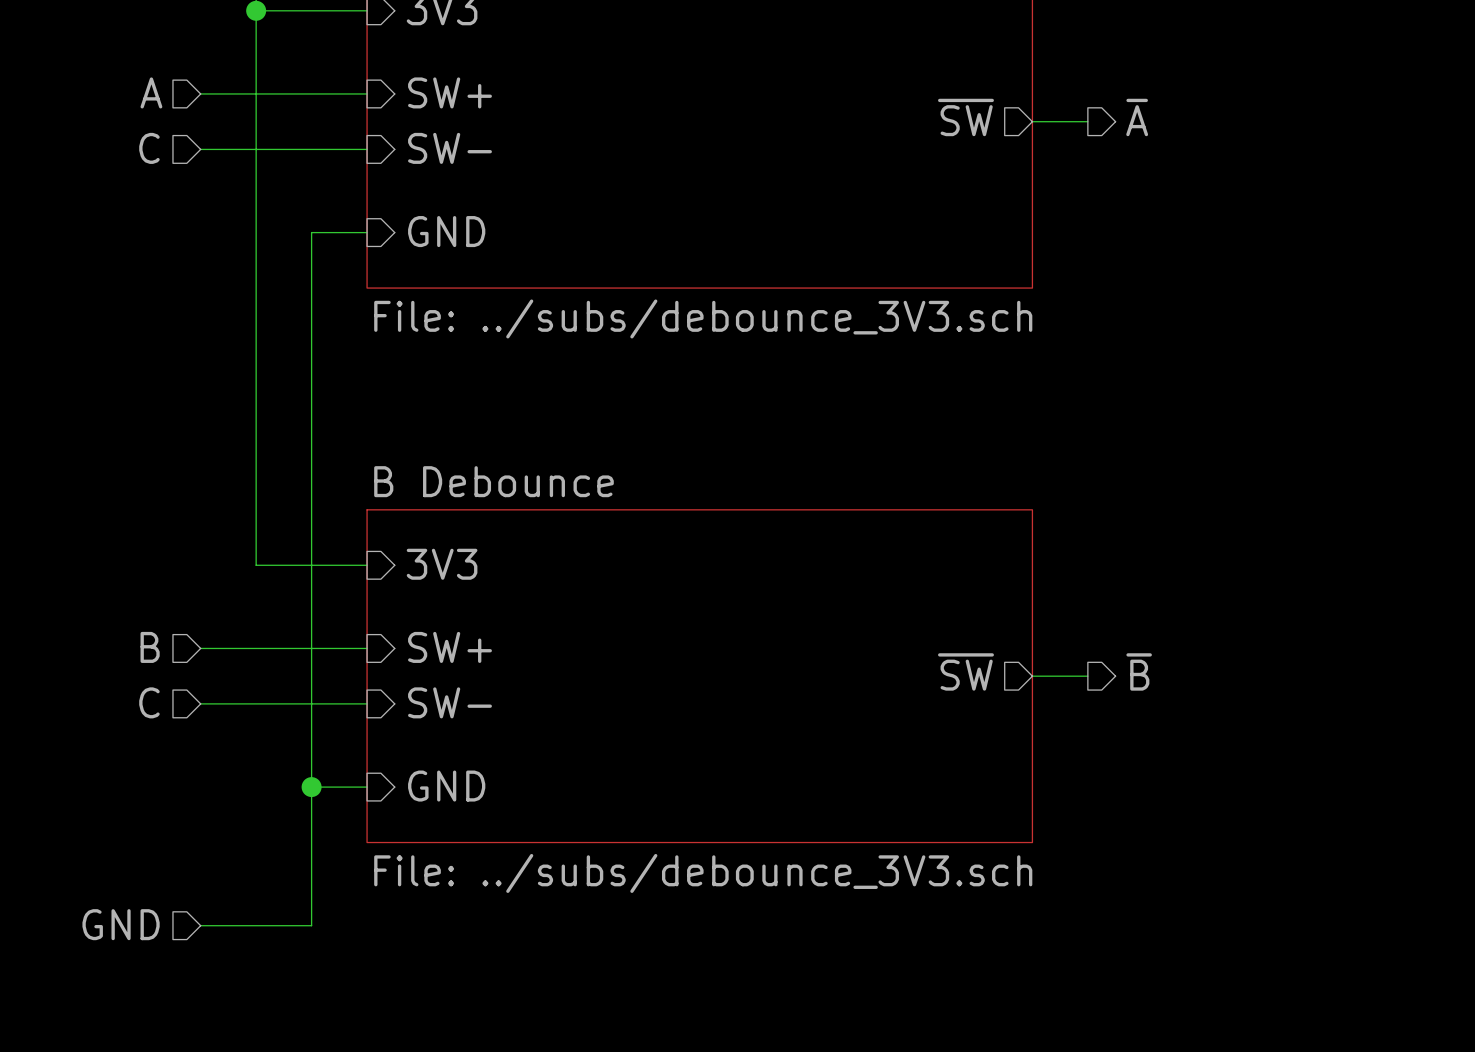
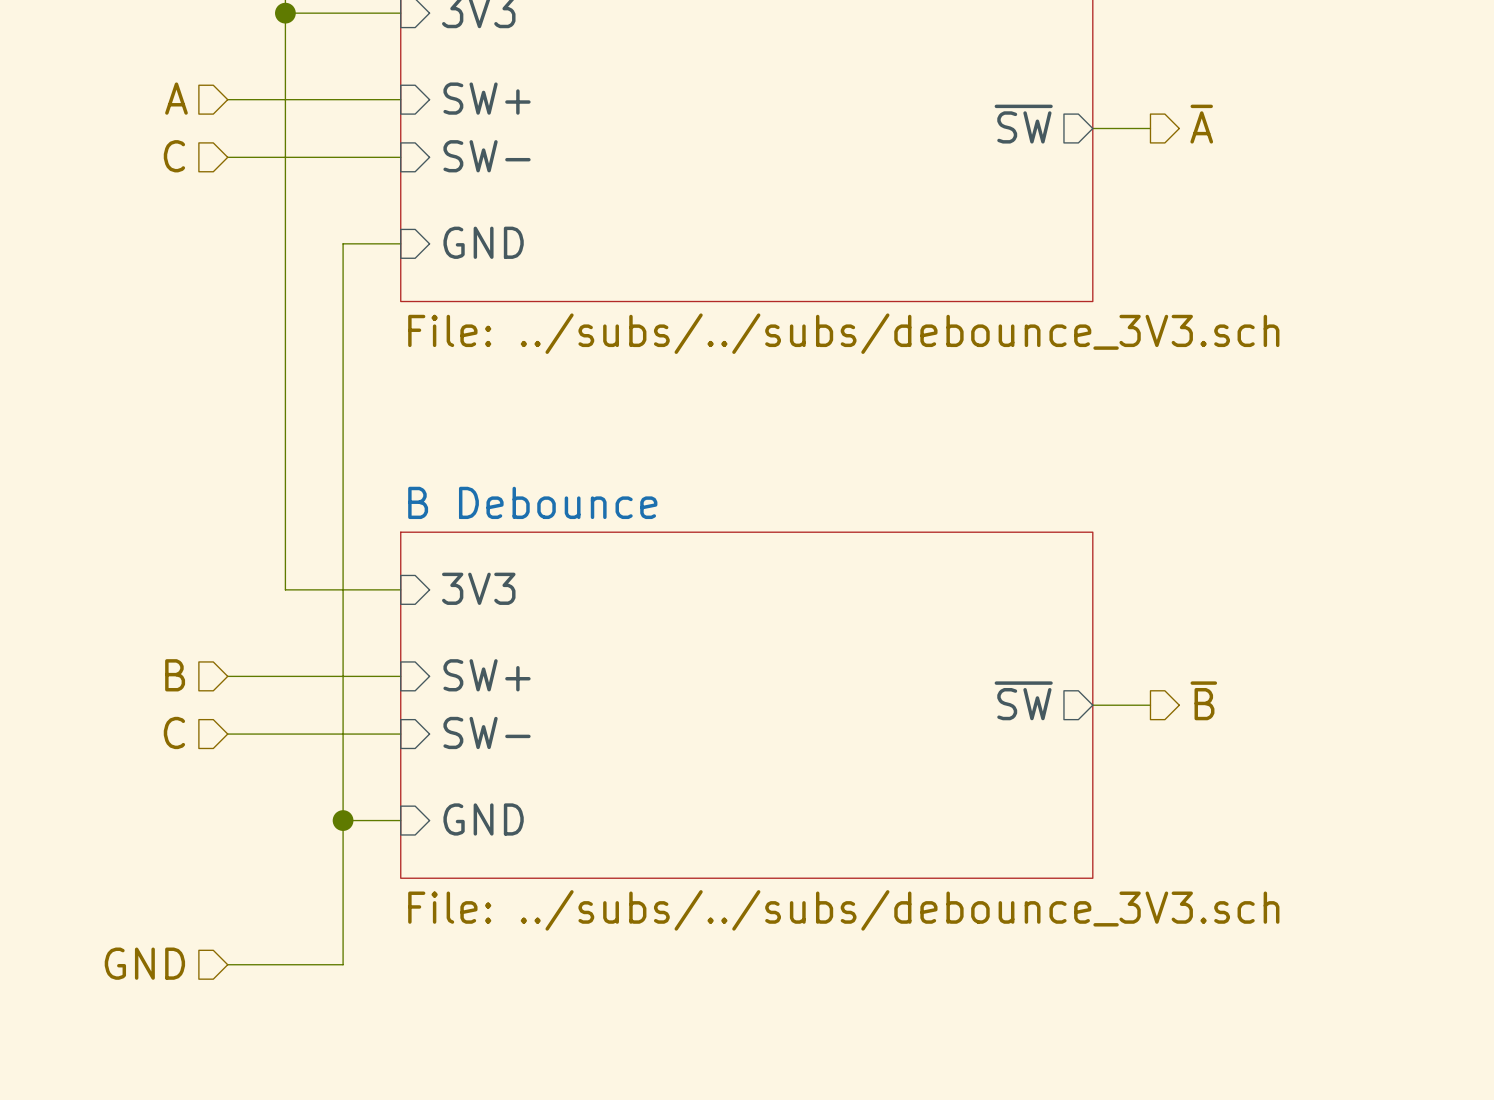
sheet value: File: ../subs/debounce_3V3.sch (703, 318) -> File: ../subs/../subs/debounce_3V3.sch (843, 333)
sheet B Debounce value: File: ../subs/debounce_3V3.sch (703, 873) -> File: ../subs/../subs/debounce_3V3.sch (843, 910)

